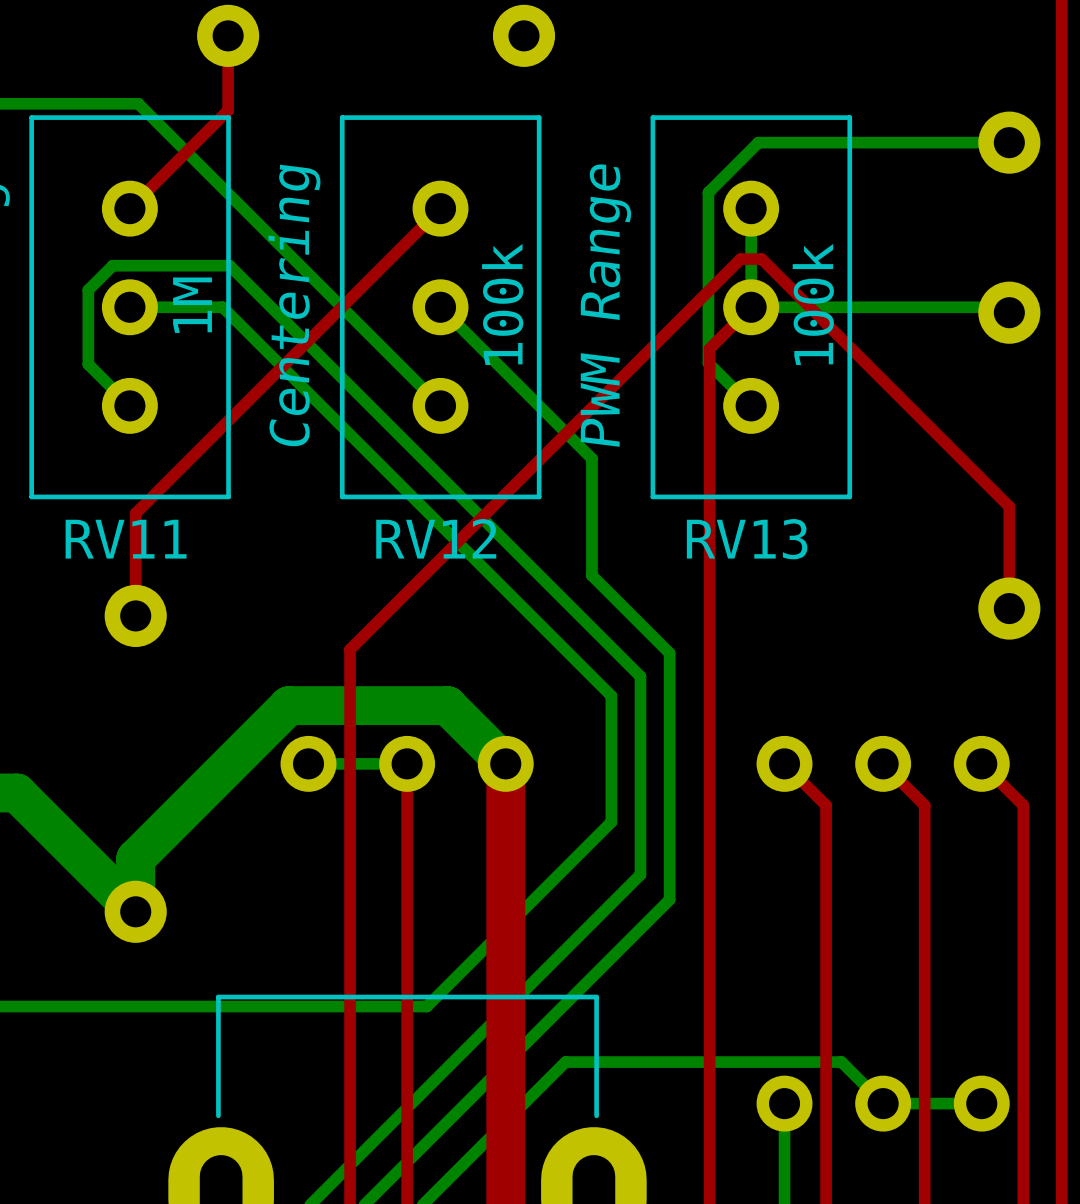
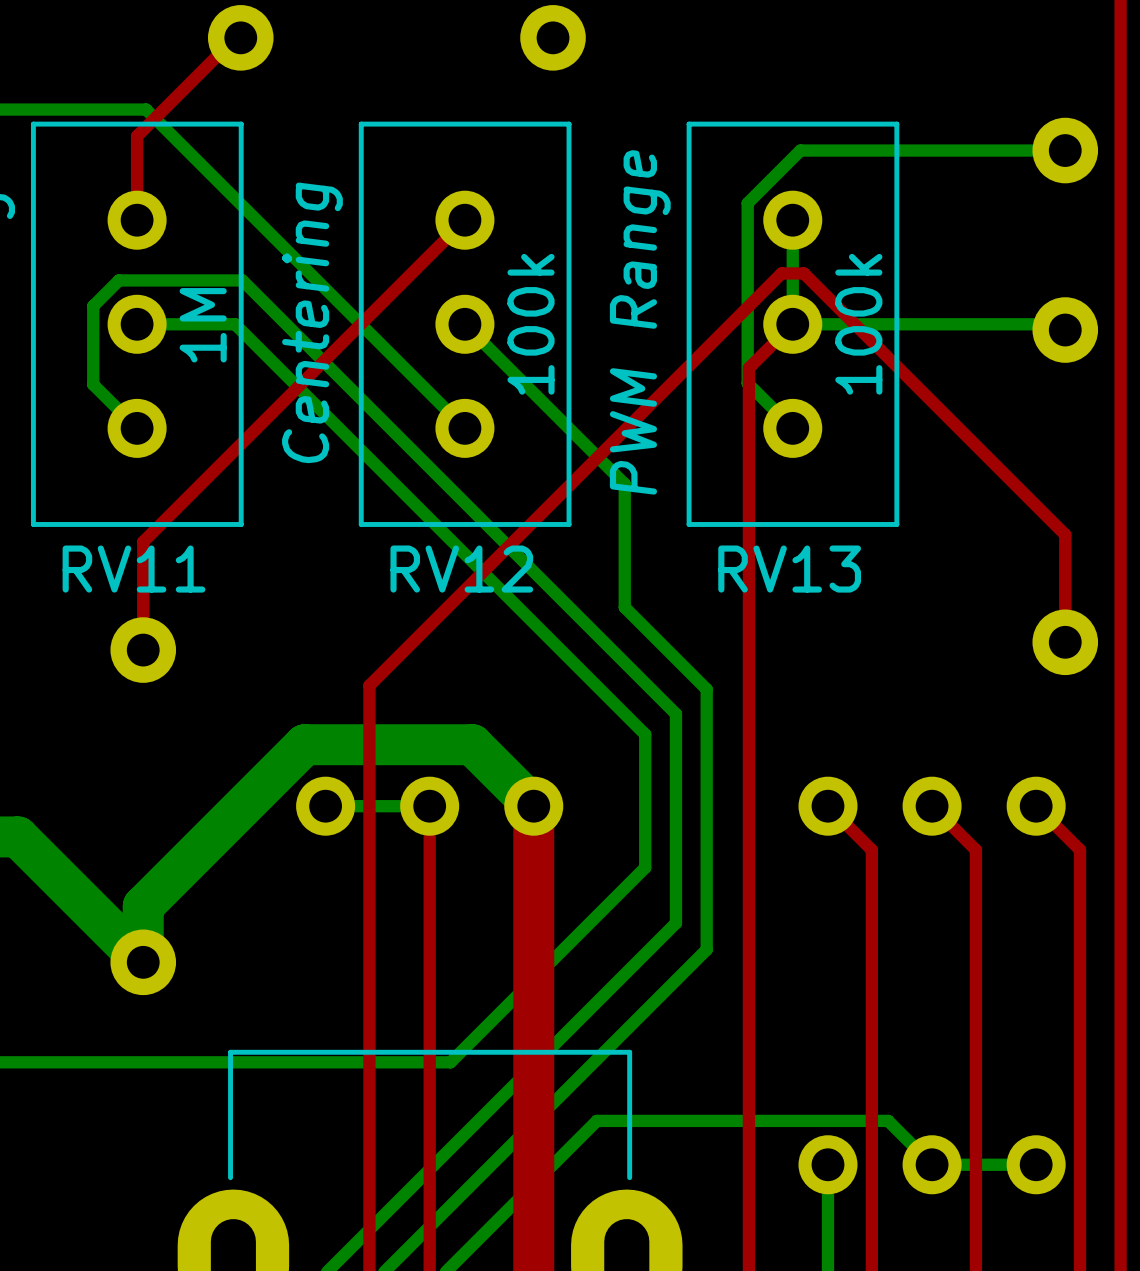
top track: (228, 35) (228, 110) (129, 208) -> (240, 37) (235, 37) (137, 136) (137, 220)

